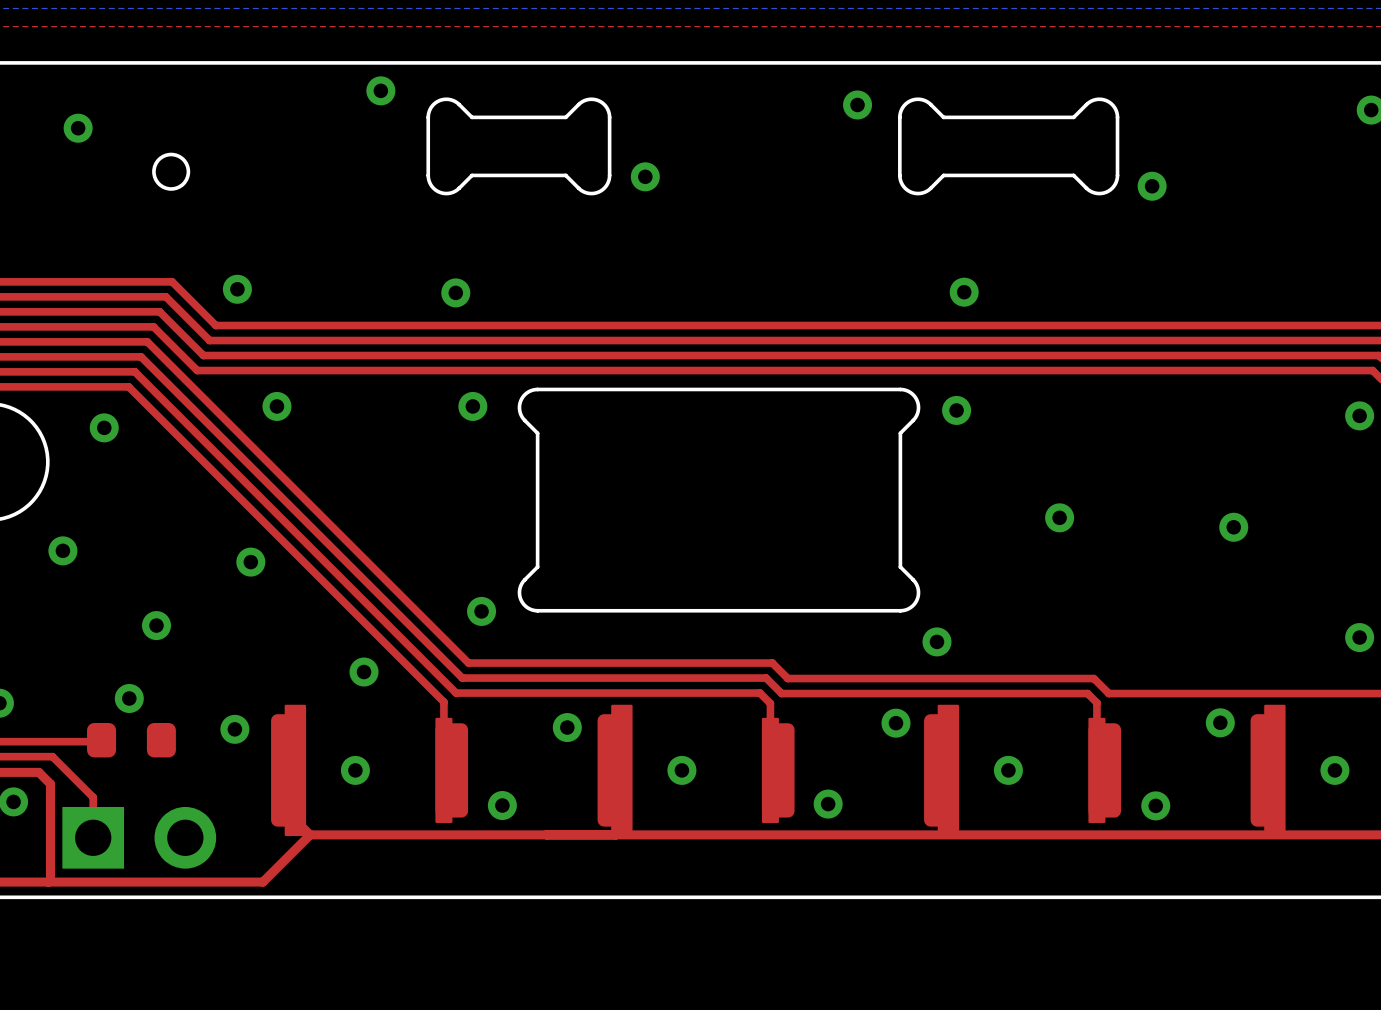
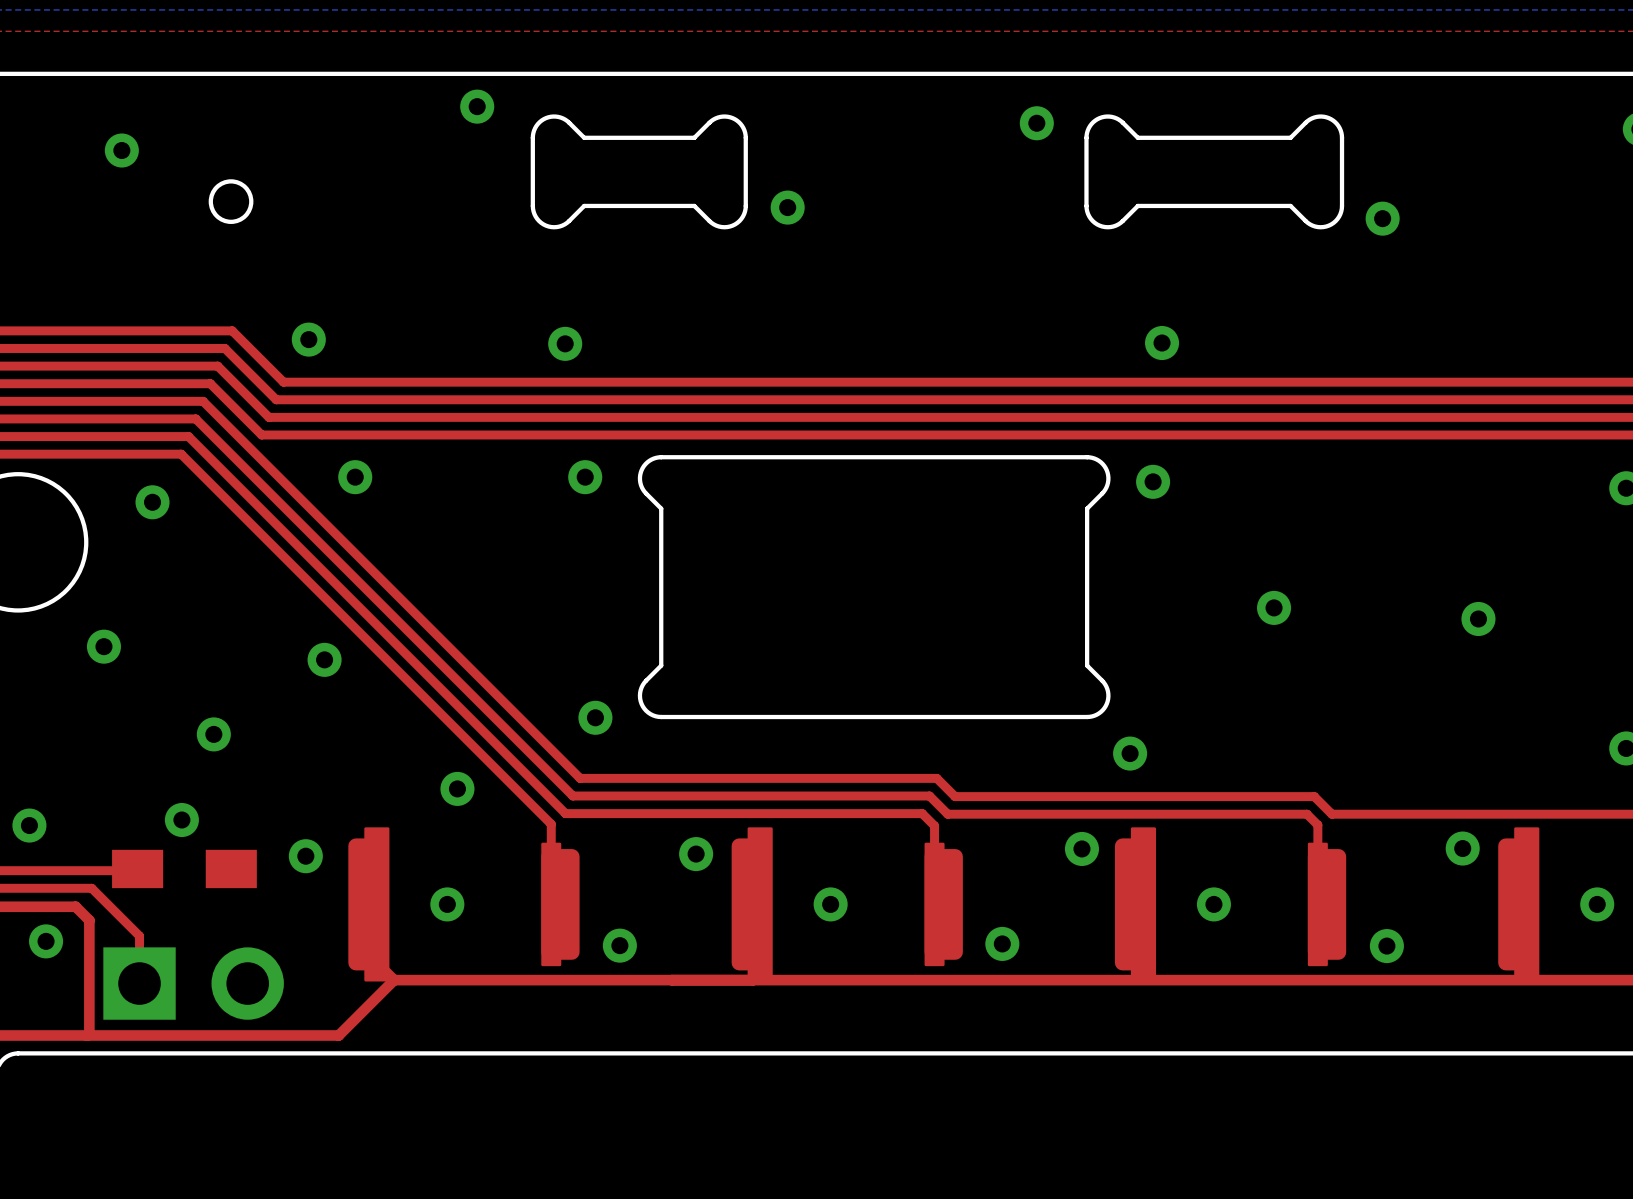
part footprint: [87, 722, 176, 758] -> [112, 849, 257, 889]

